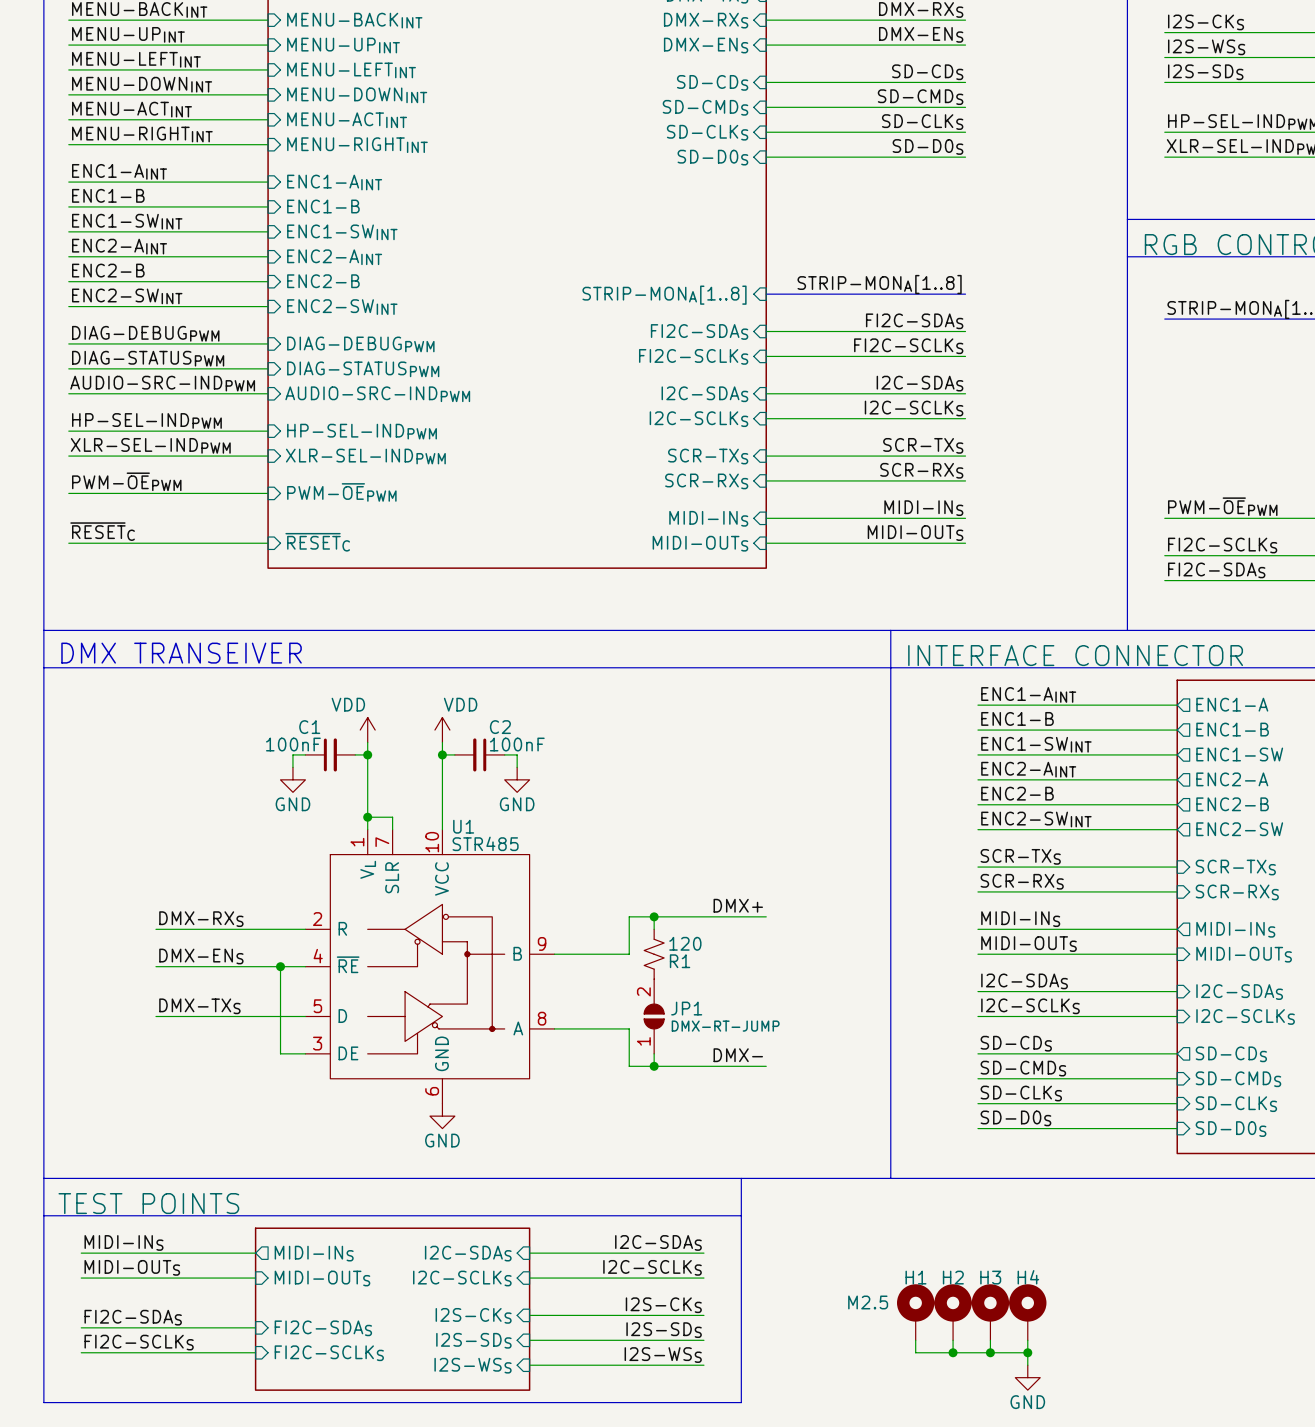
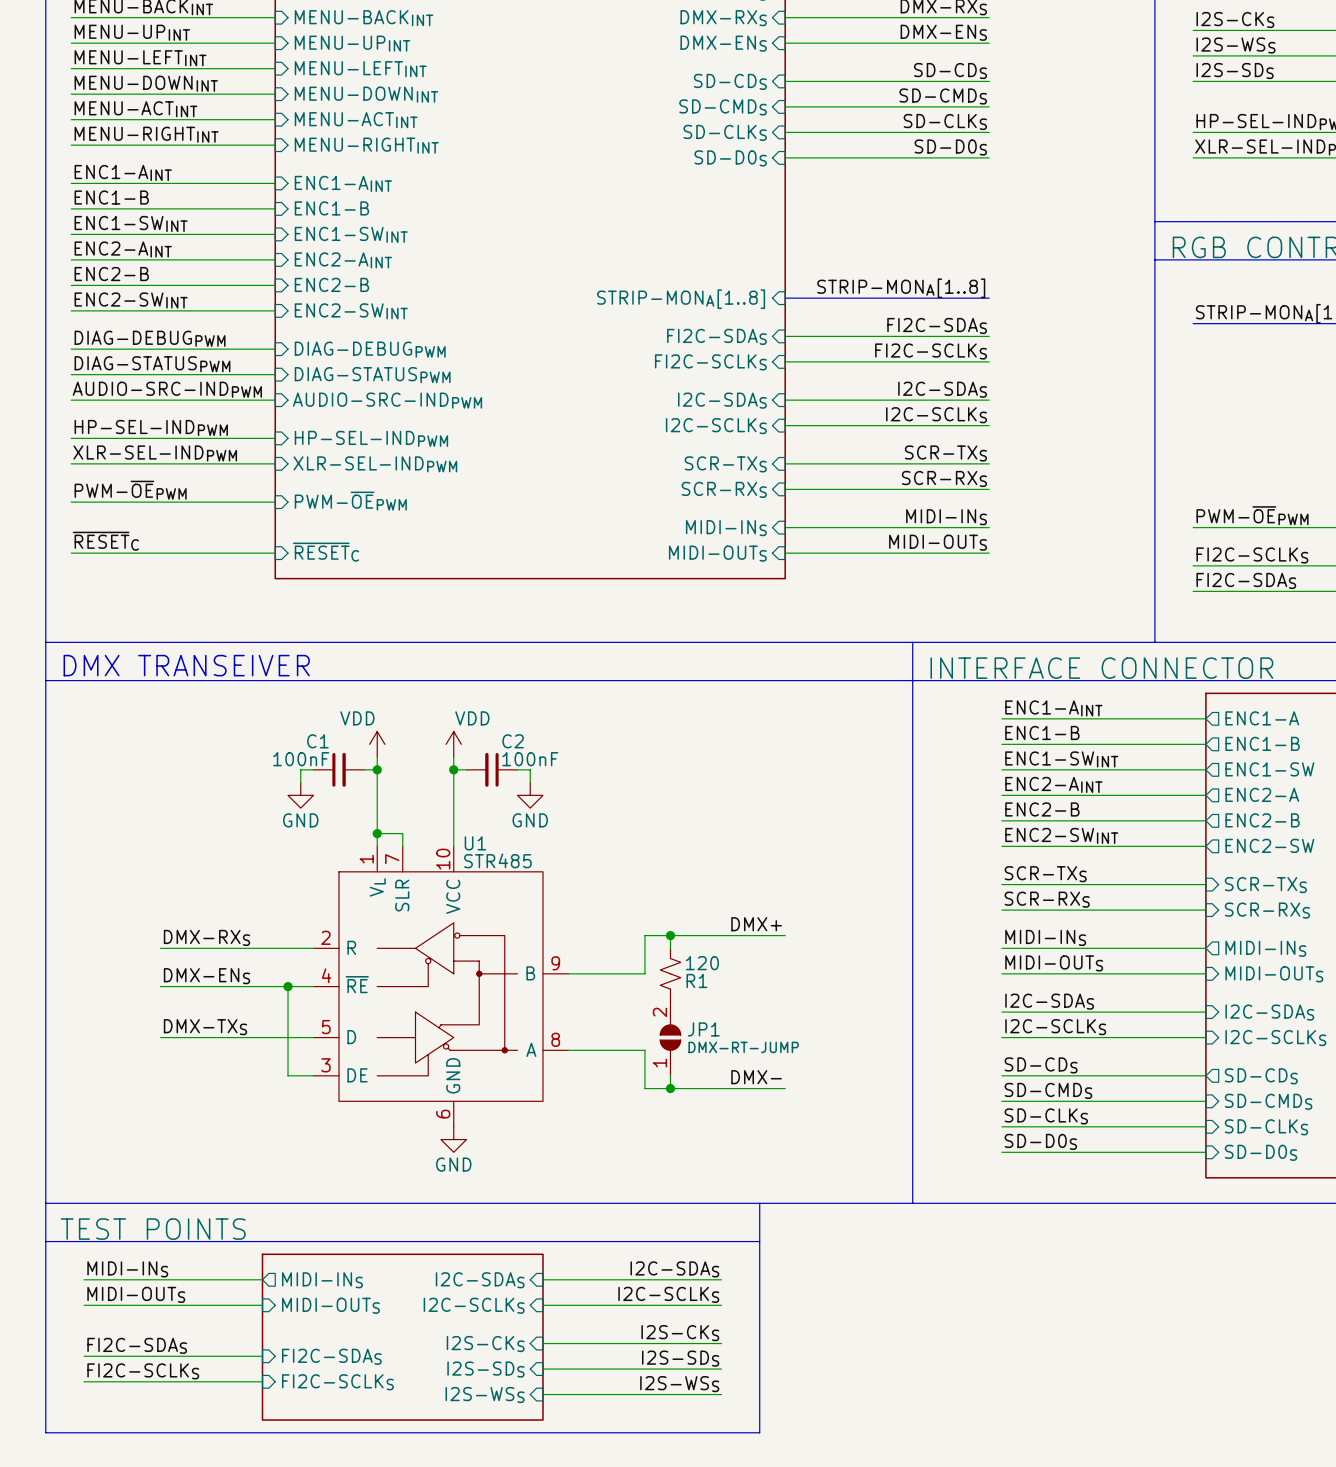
H1: M2.5 (915, 1312) -> none
H2: (953, 1312) -> none
H3: (990, 1312) -> none
H4: (1027, 1312) -> none
wire: (915, 1340) (915, 1352) (1027, 1352) -> none
wire: (953, 1340) (953, 1352) -> none
wire: (990, 1340) (990, 1352) -> none
wire: (1027, 1340) (1027, 1365) -> none
junction: (953, 1352) -> none
junction: (990, 1352) -> none
junction: (1027, 1352) -> none
power symbol: GND (1027, 1377) -> none

